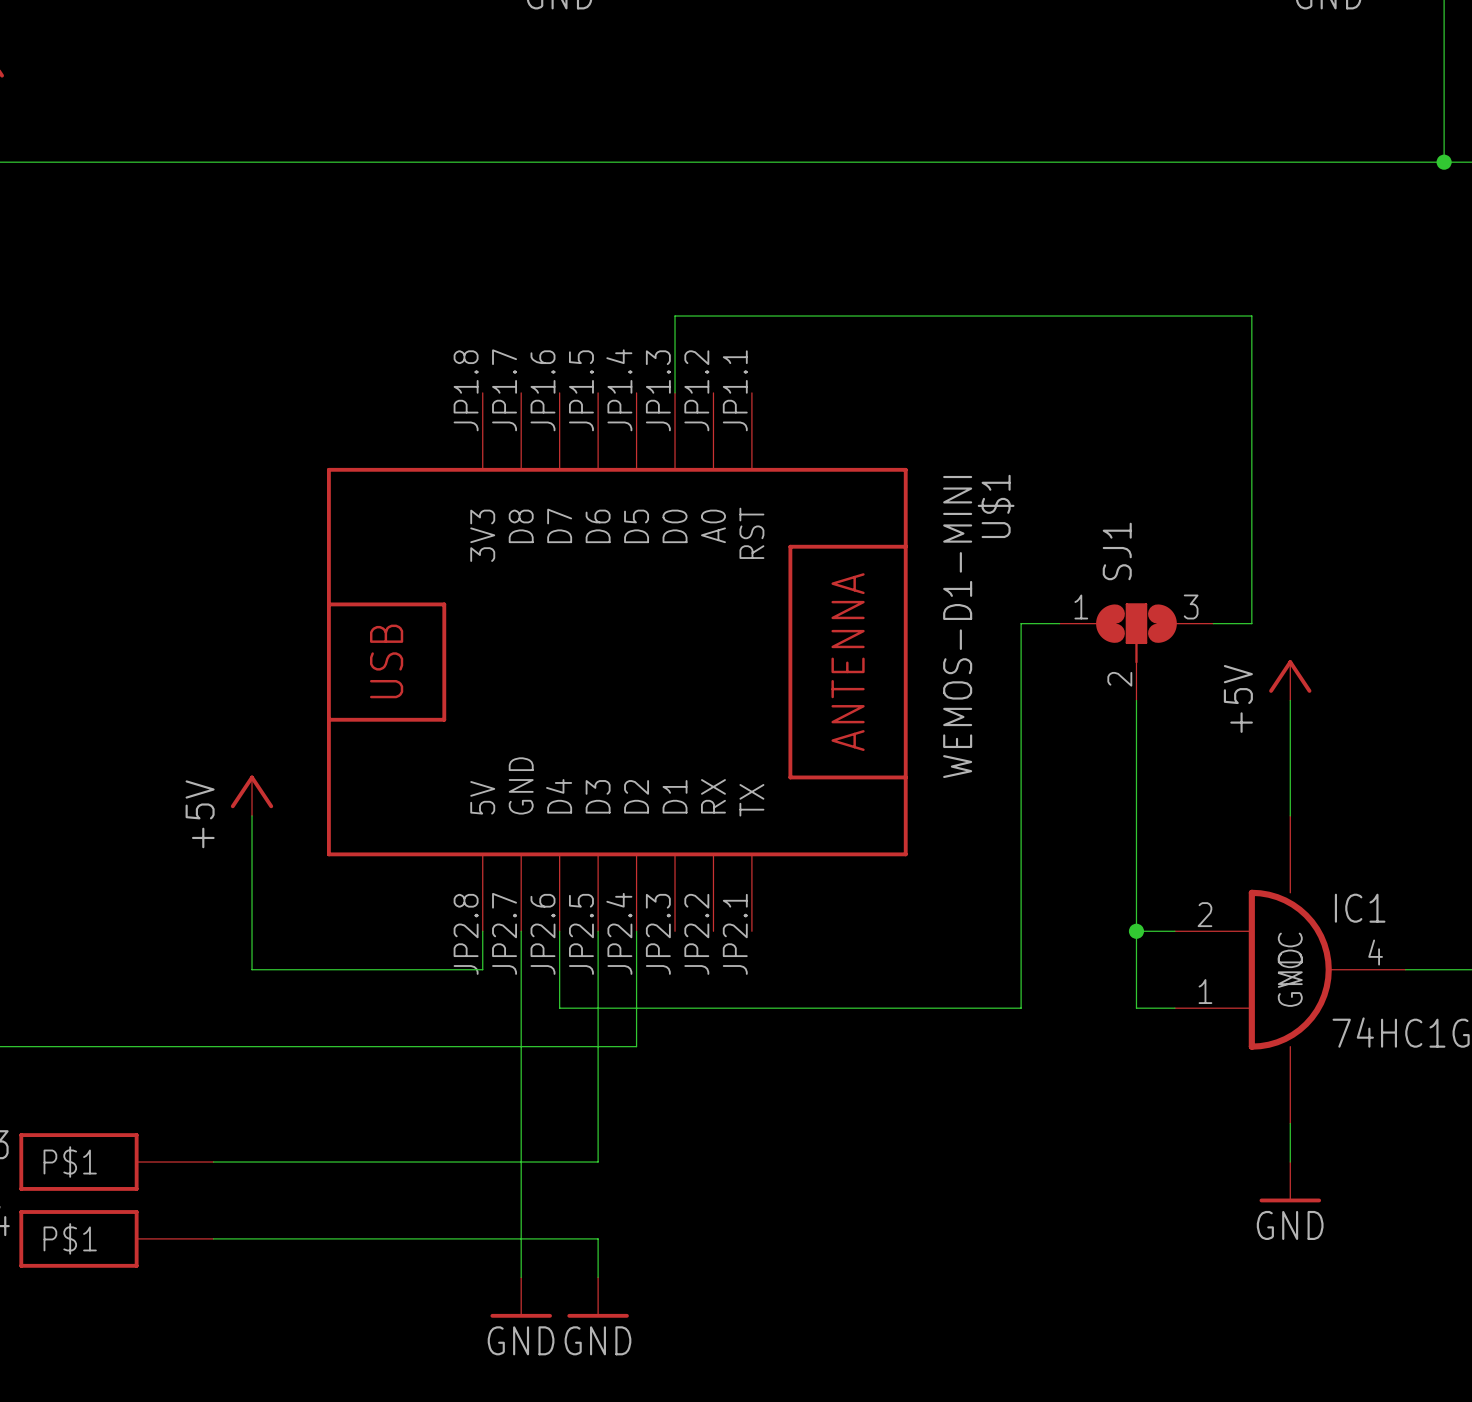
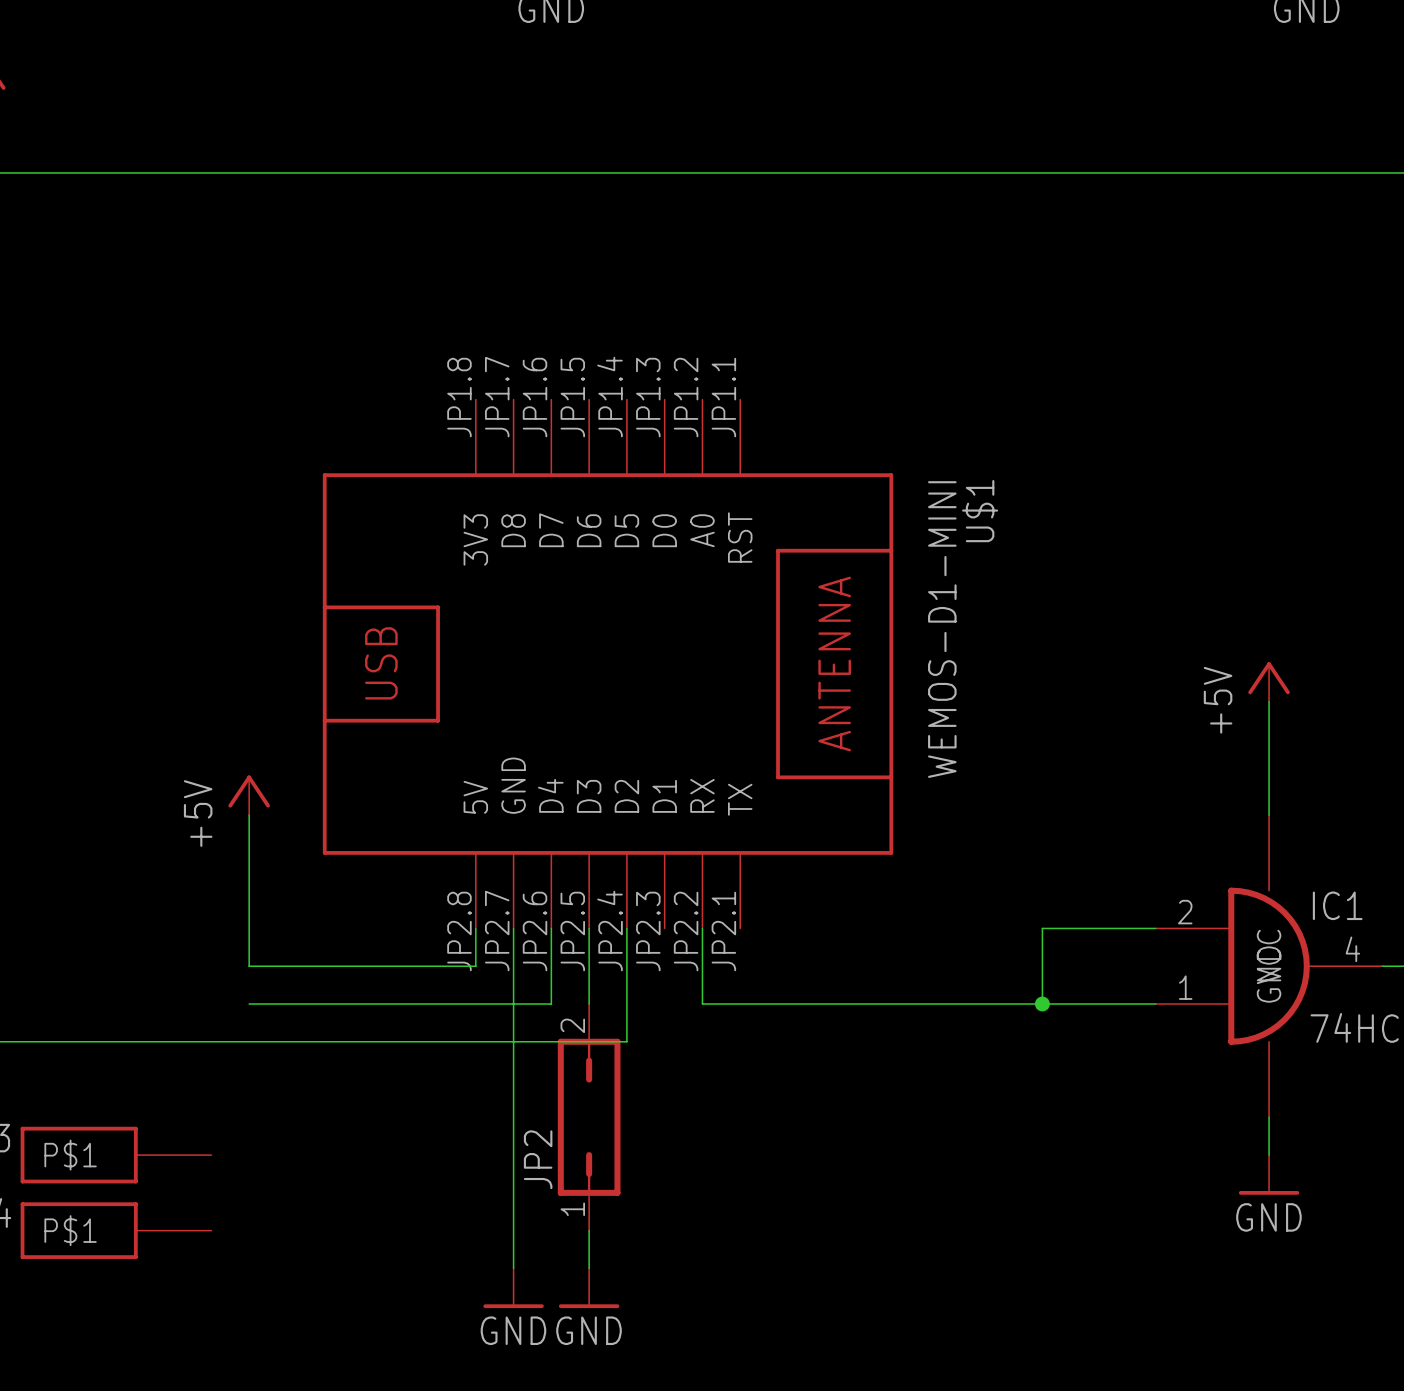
wire: (675, 392) (675, 316) (1251, 316) (1251, 623) (1213, 623) -> none
wire: (1059, 623) (1021, 623) (1021, 1008) -> none
SJ1: (1136, 651) -> none
wire: (1136, 700) (1136, 1008) -> (1004, 1004) (1117, 1004)
wire: none -> (1117, 928) (1042, 928) (1042, 1004)
junction: (1136, 931) -> none
wire: none -> (249, 1004) (551, 1004)
wire: (559, 1008) (713, 1008) -> (702, 928) (702, 1004)
wire: (598, 1008) (598, 1162) (213, 1162) -> none
junction: none -> (1042, 1004)
JP2: none -> (589, 1117)
wire: (213, 1238) (598, 1238) -> none

